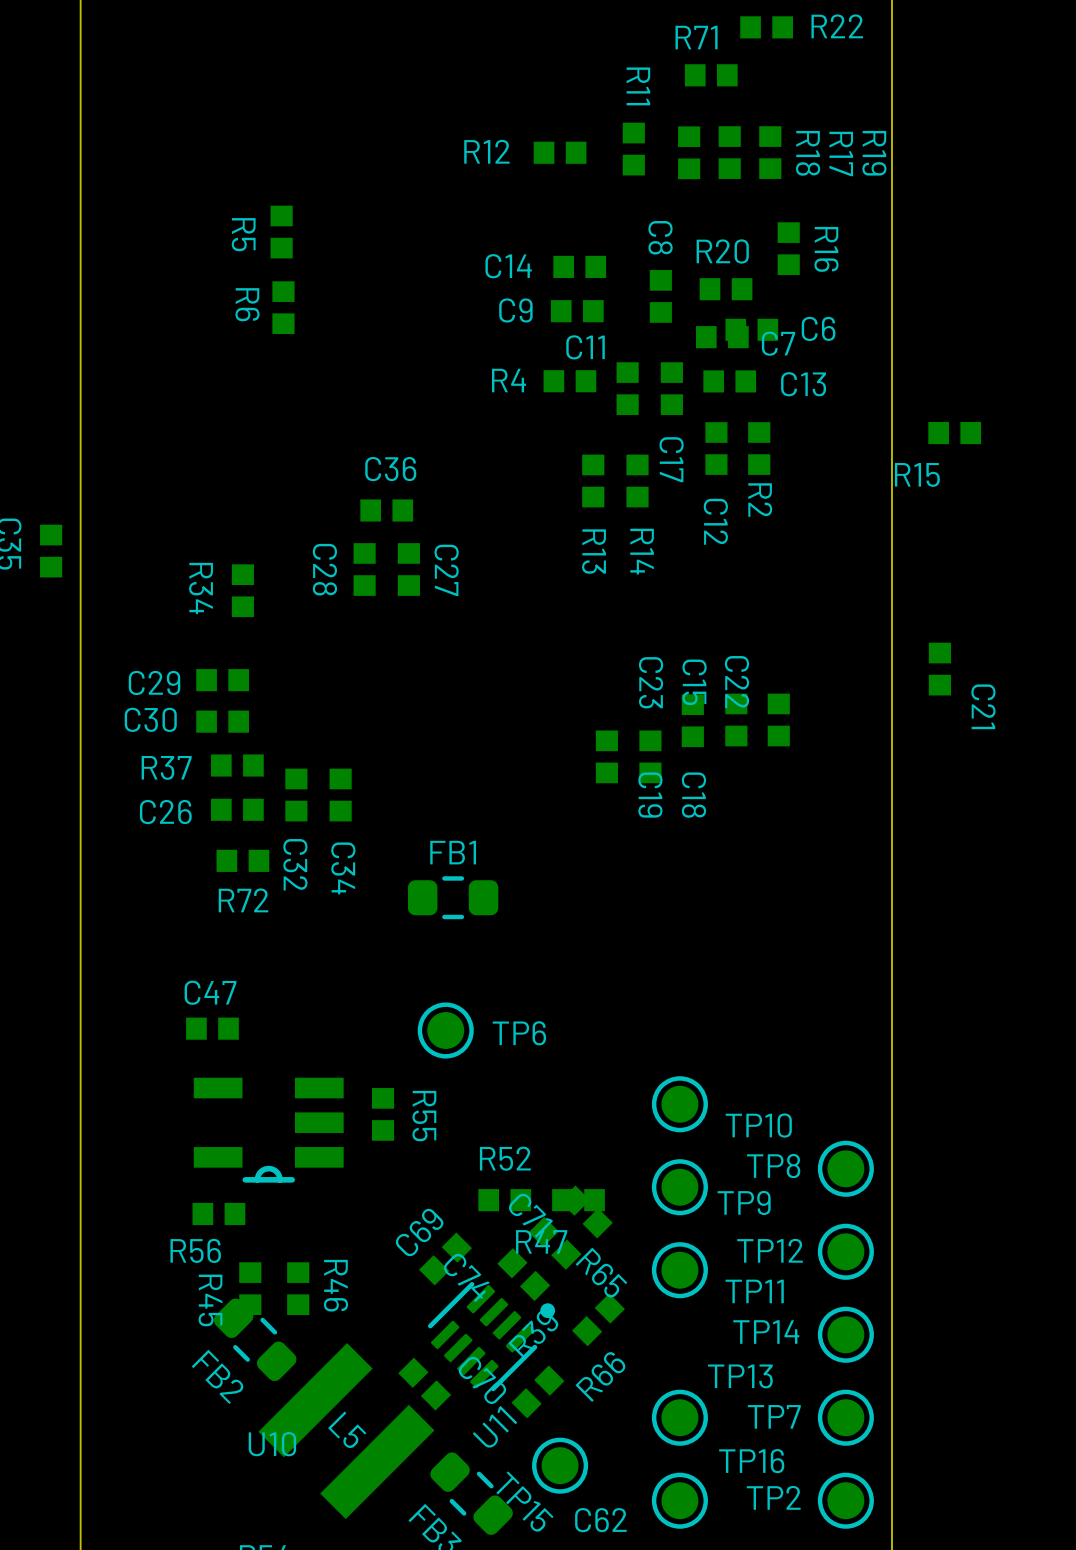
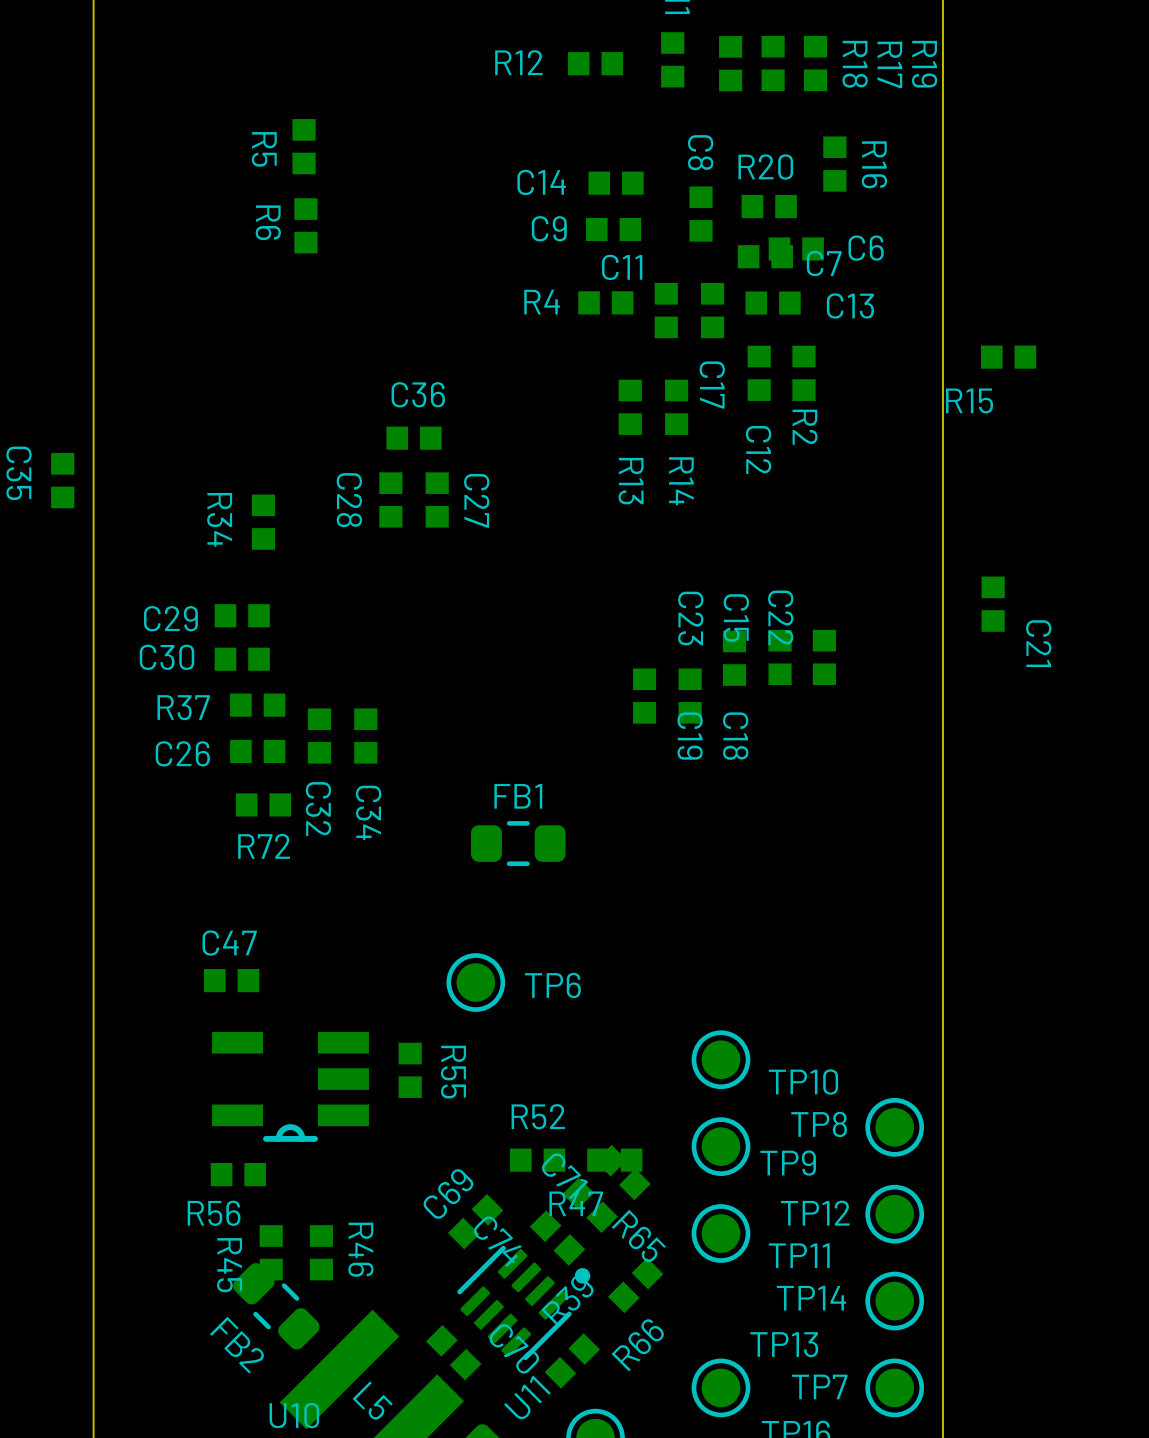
FB1 position: (453, 897) -> (518, 843)

